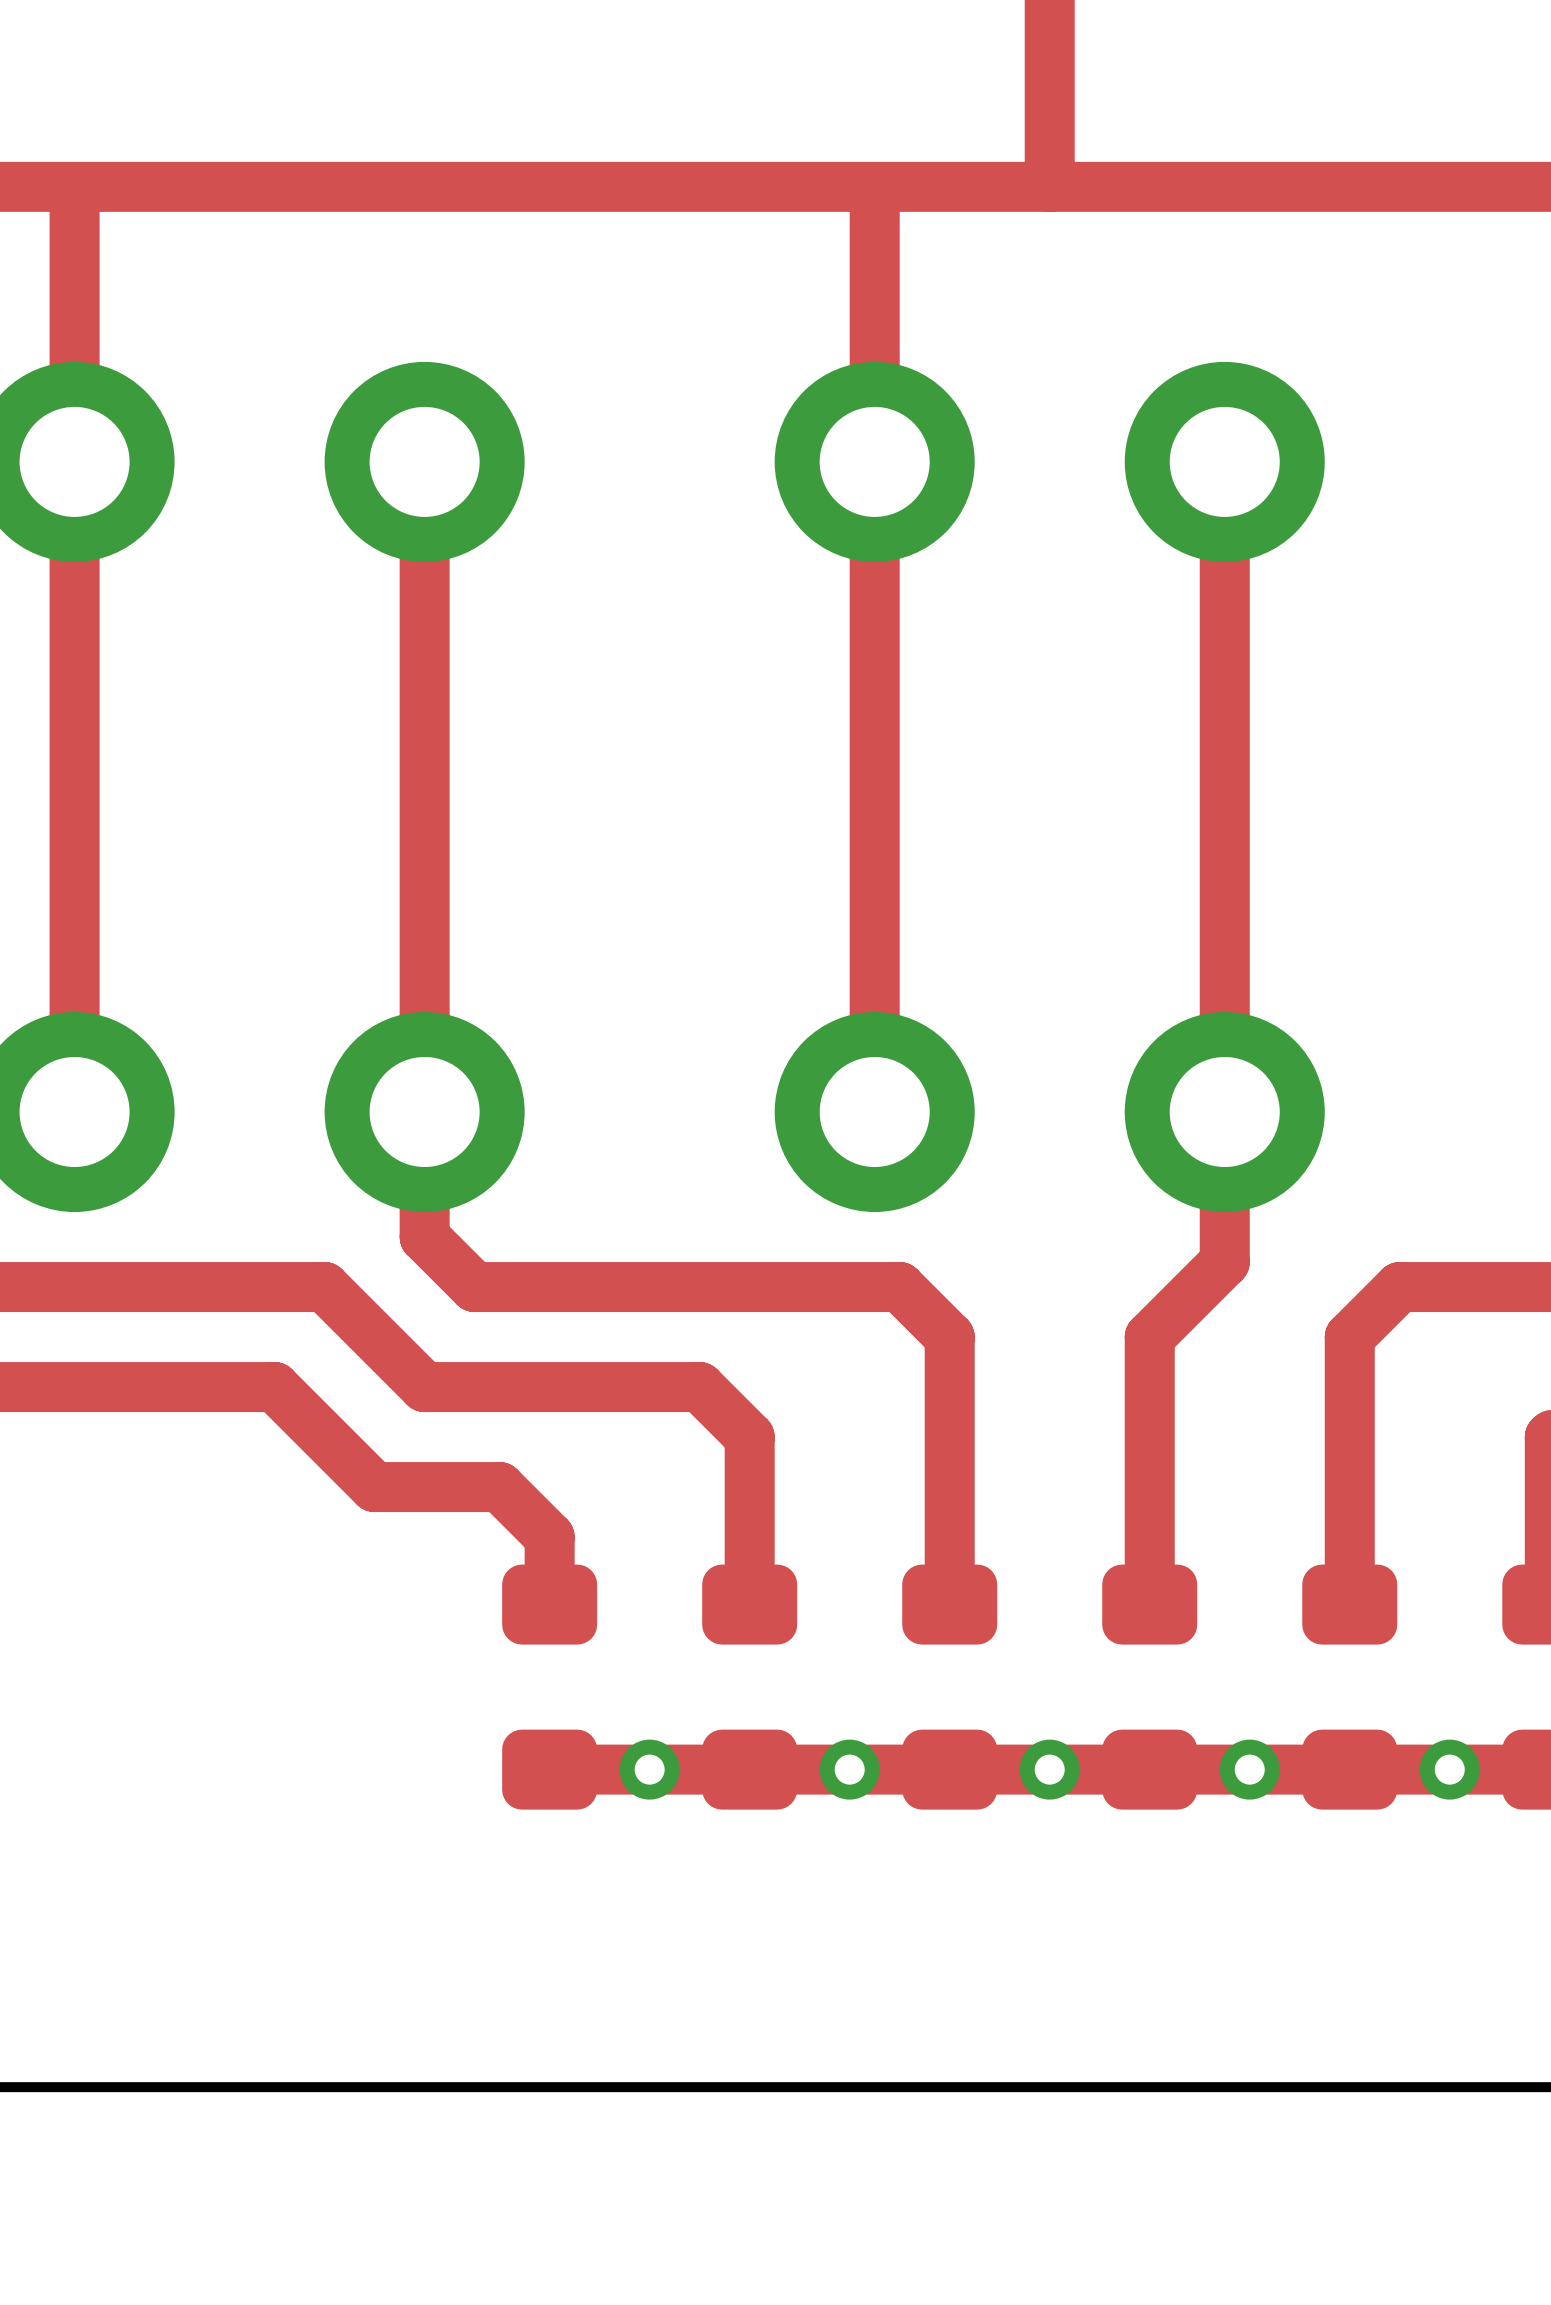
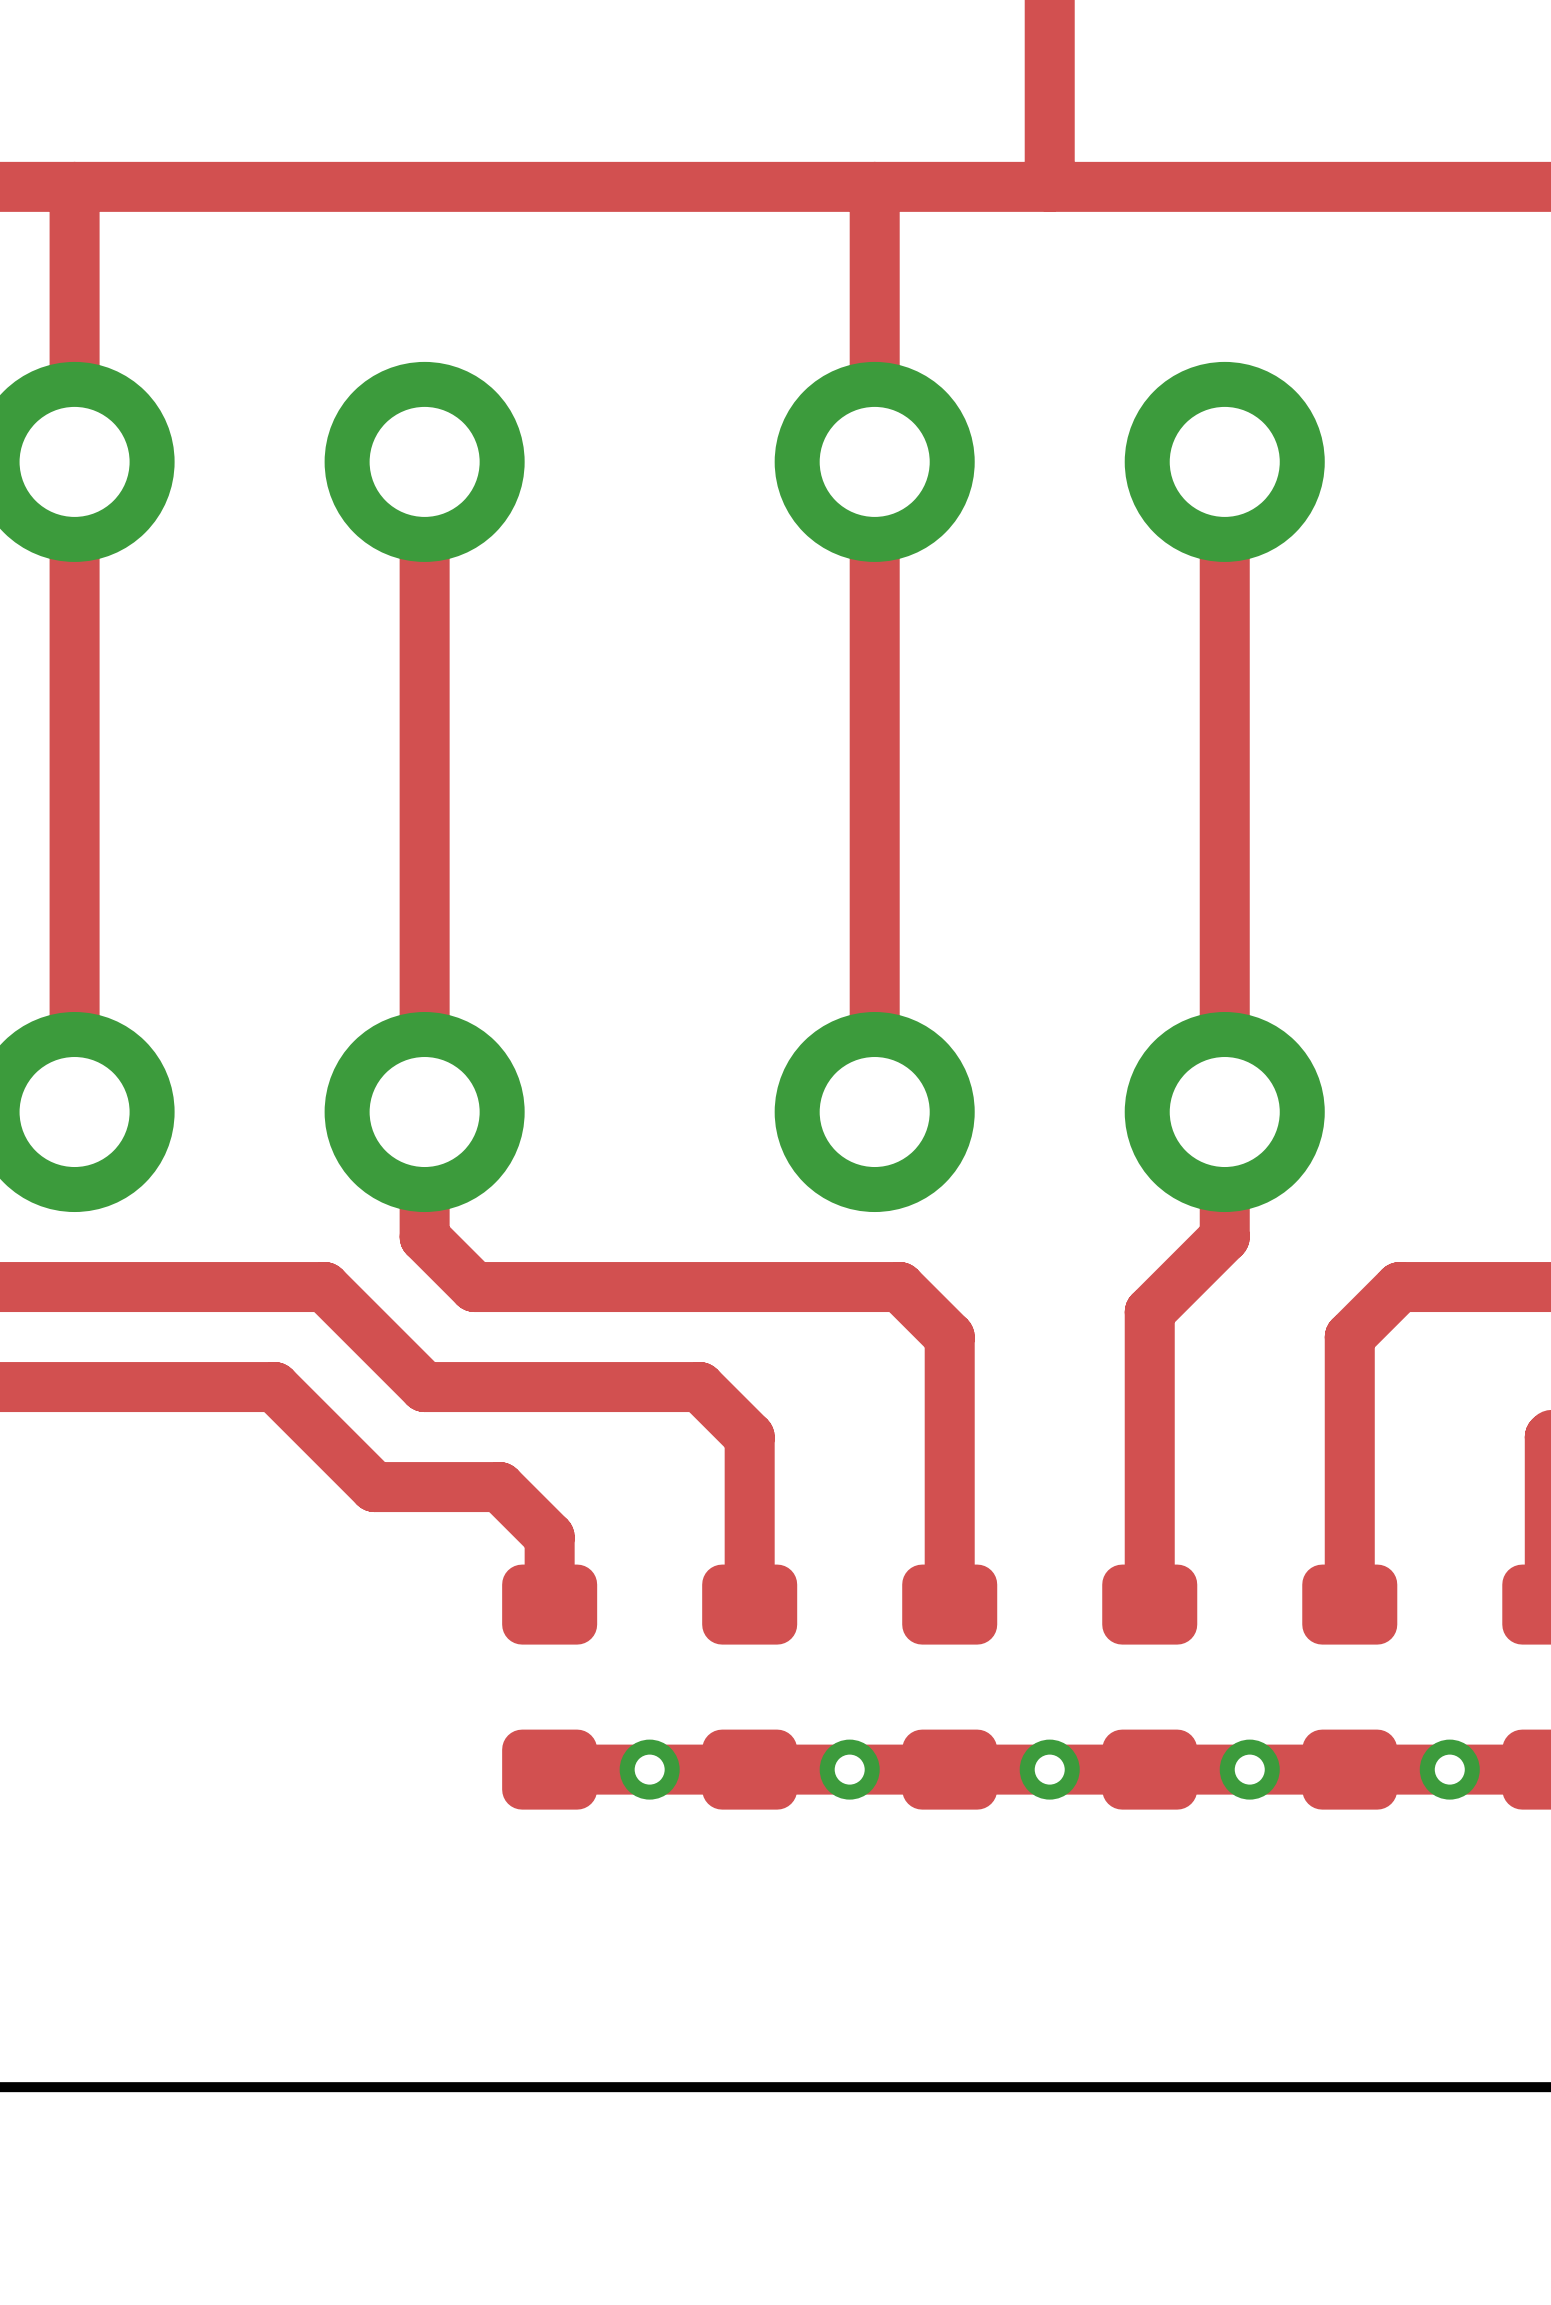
top track: (1224, 1237) (1224, 1262) (1149, 1337) -> (1224, 1237) (1149, 1312) (1149, 1337)

